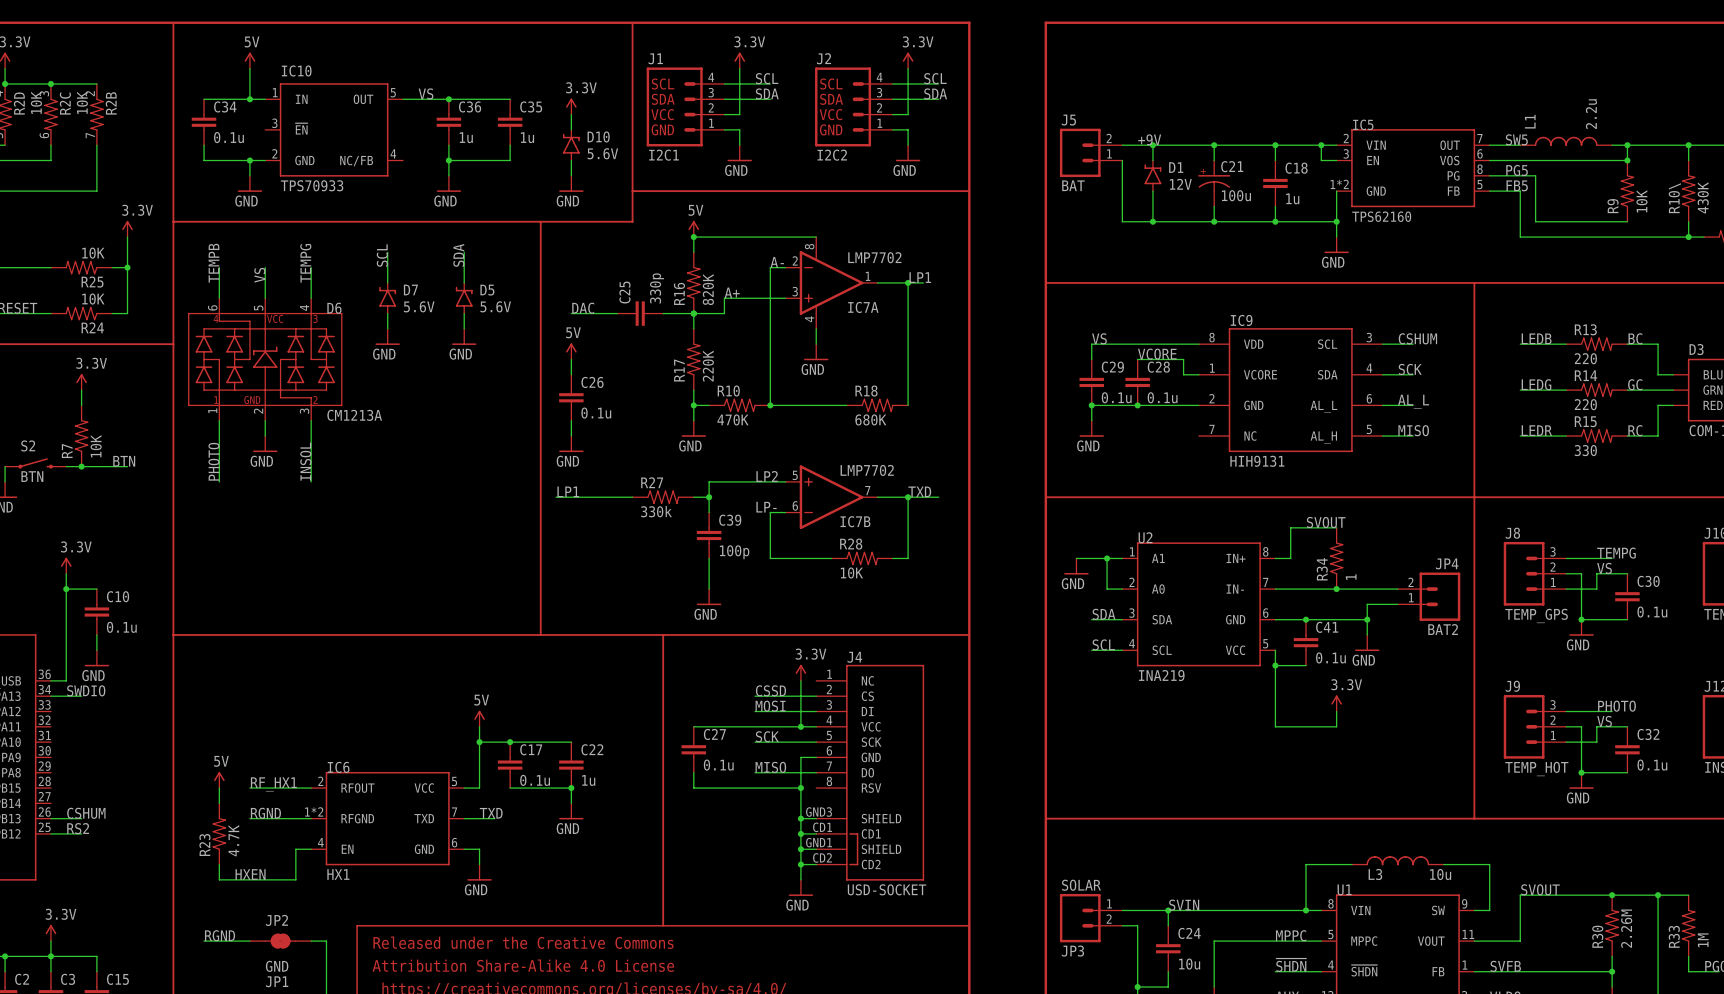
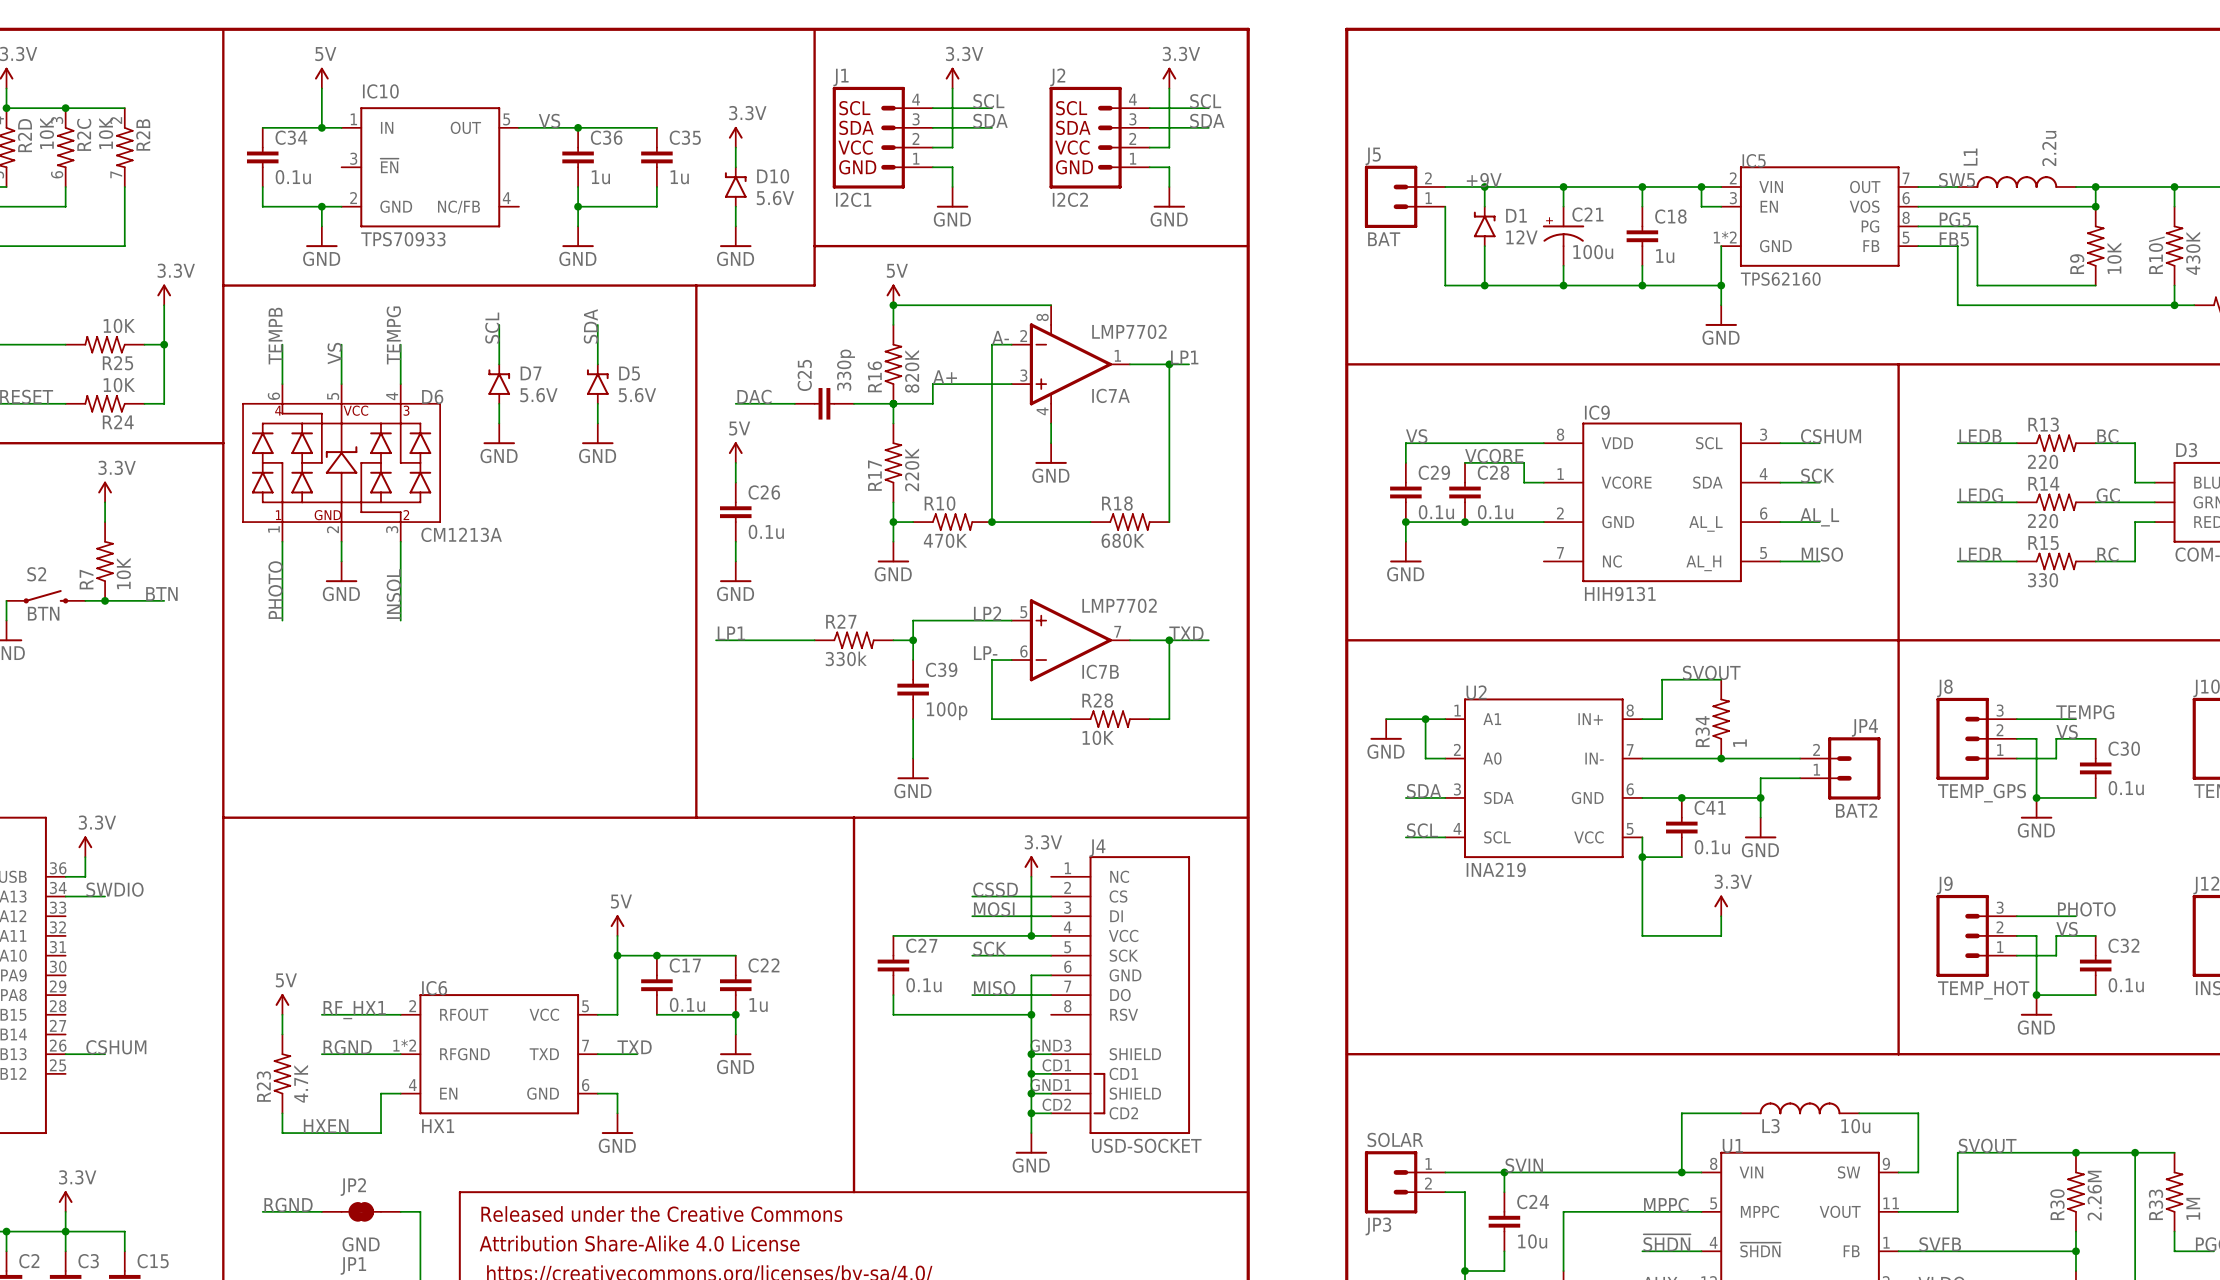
power symbol position: 3.3V (66, 565) -> 3.3V (85, 846)
wire: (66, 573) (66, 665) -> none
wire: (66, 589) (96, 589) -> none
junction: (66, 589) -> none
C10: 0.1u (96, 612) -> none
wire: (96, 634) (96, 650) -> none
power symbol: GND (96, 658) -> none
label: RS2 (78, 828) -> none
wire: (50, 833) (81, 833) -> none

